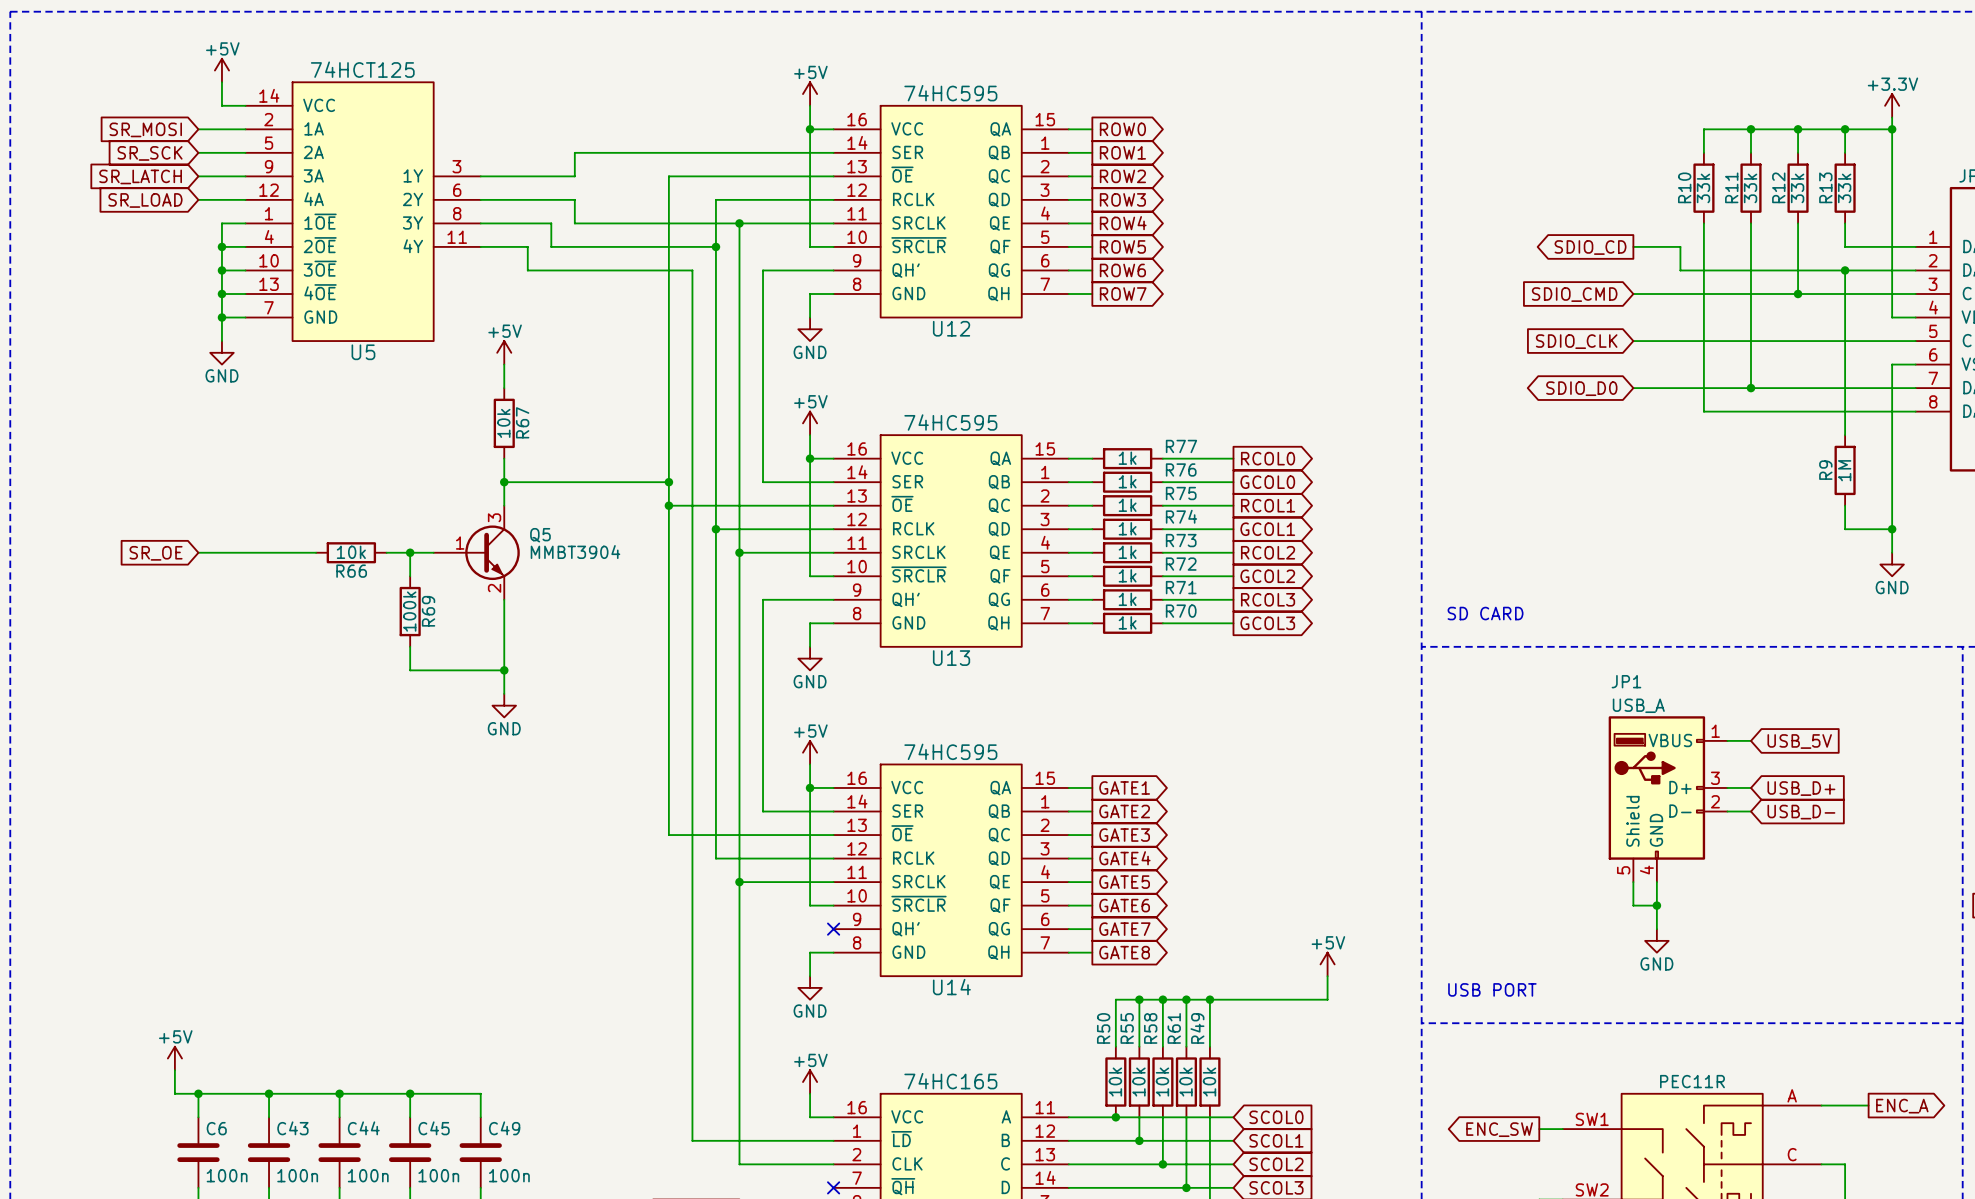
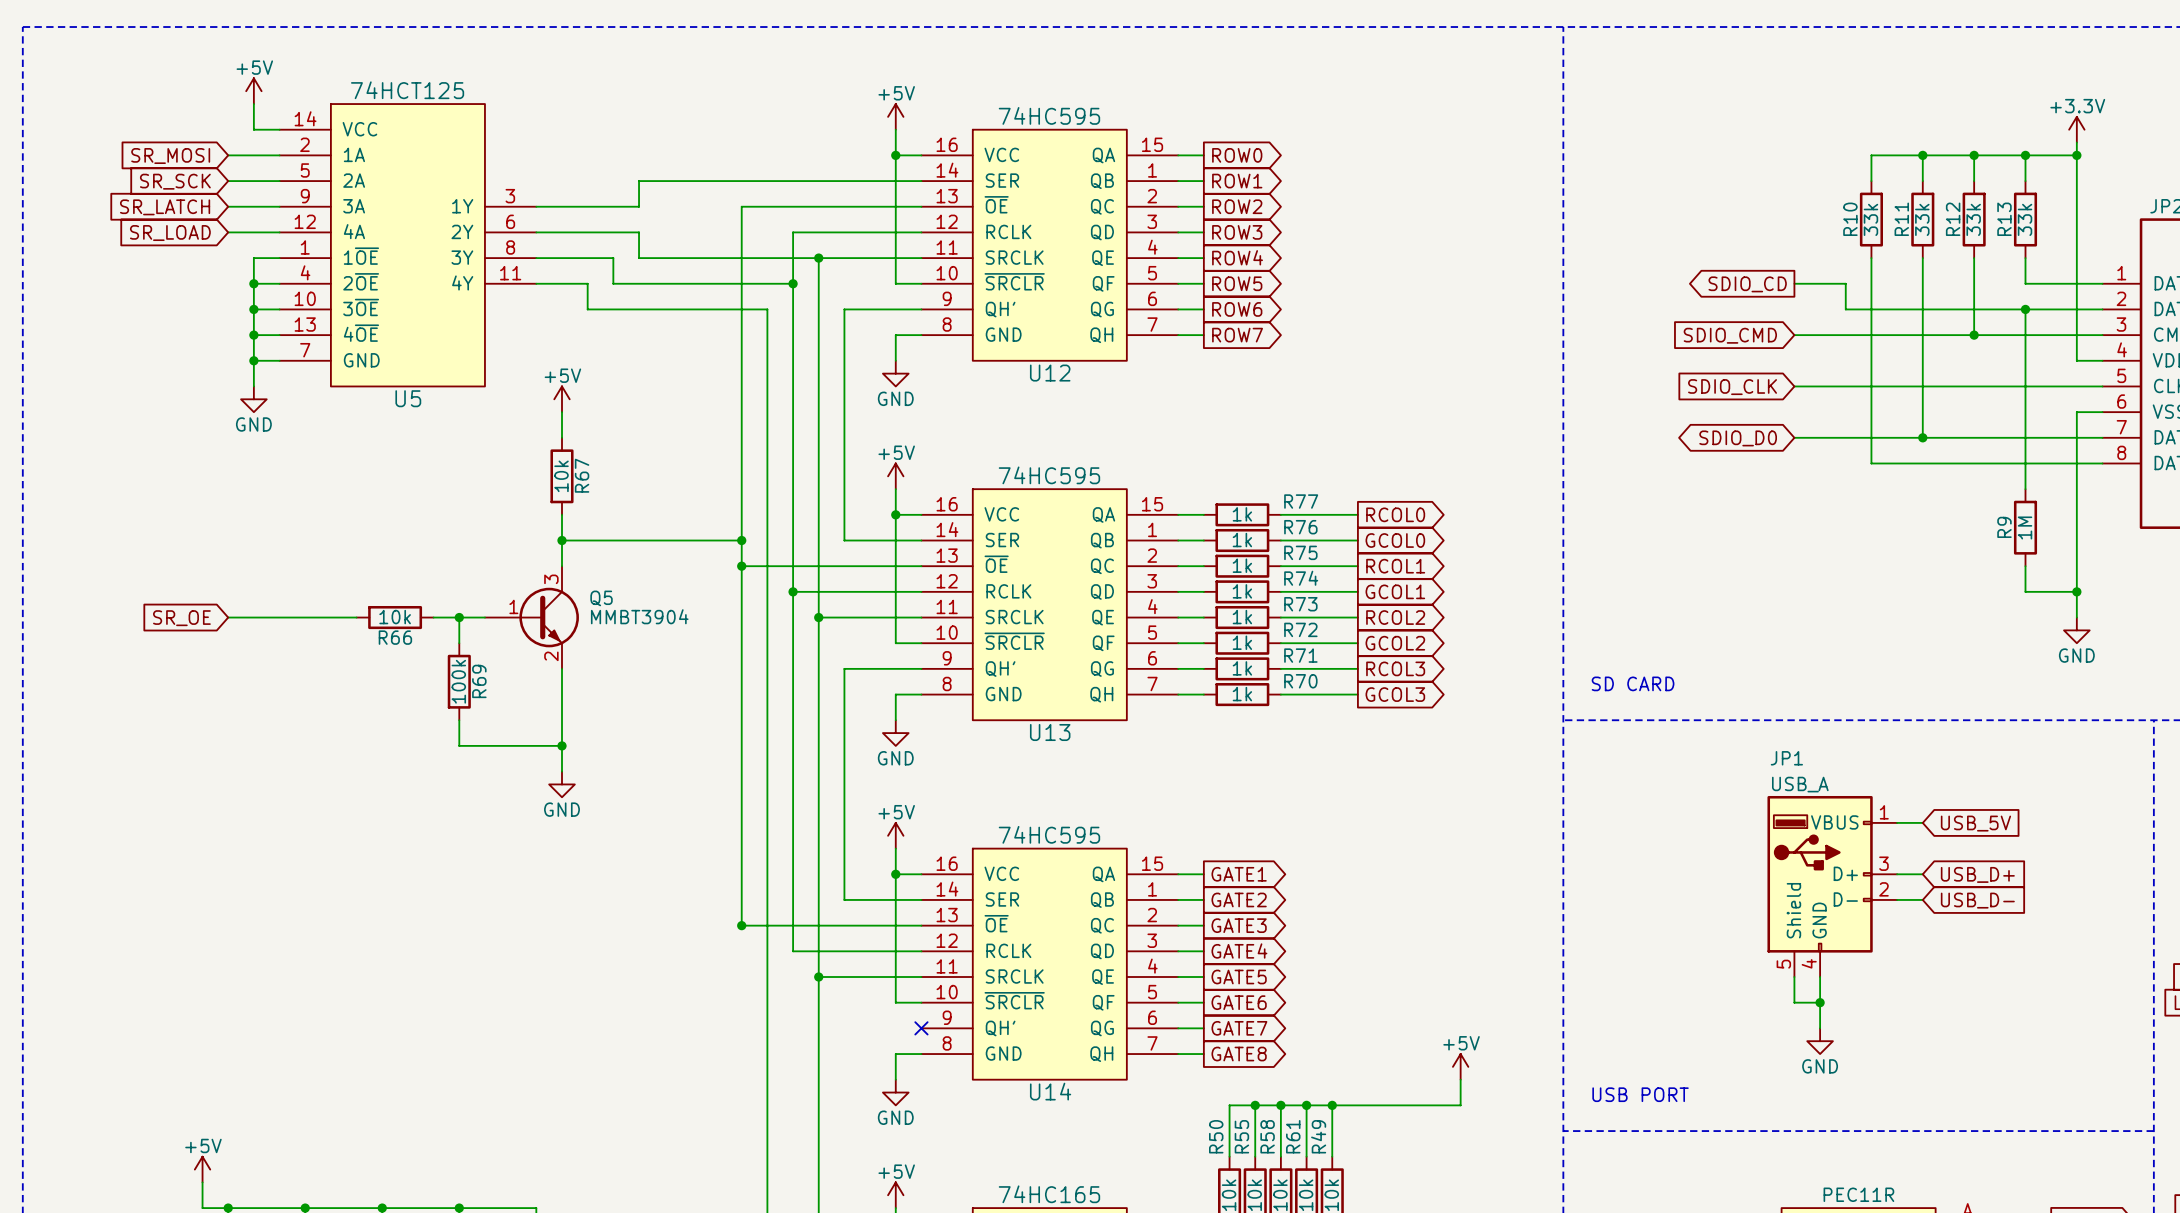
junction: none -> (741, 925)

